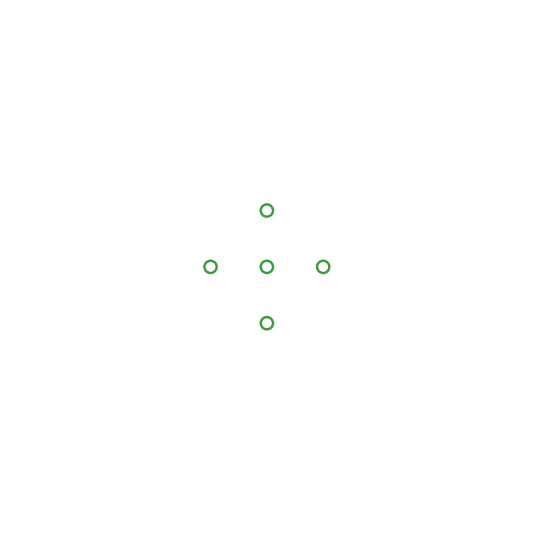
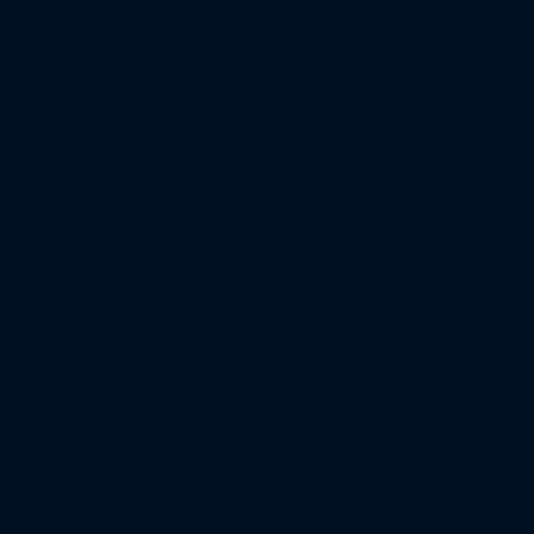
part: (266, 266) -> none

